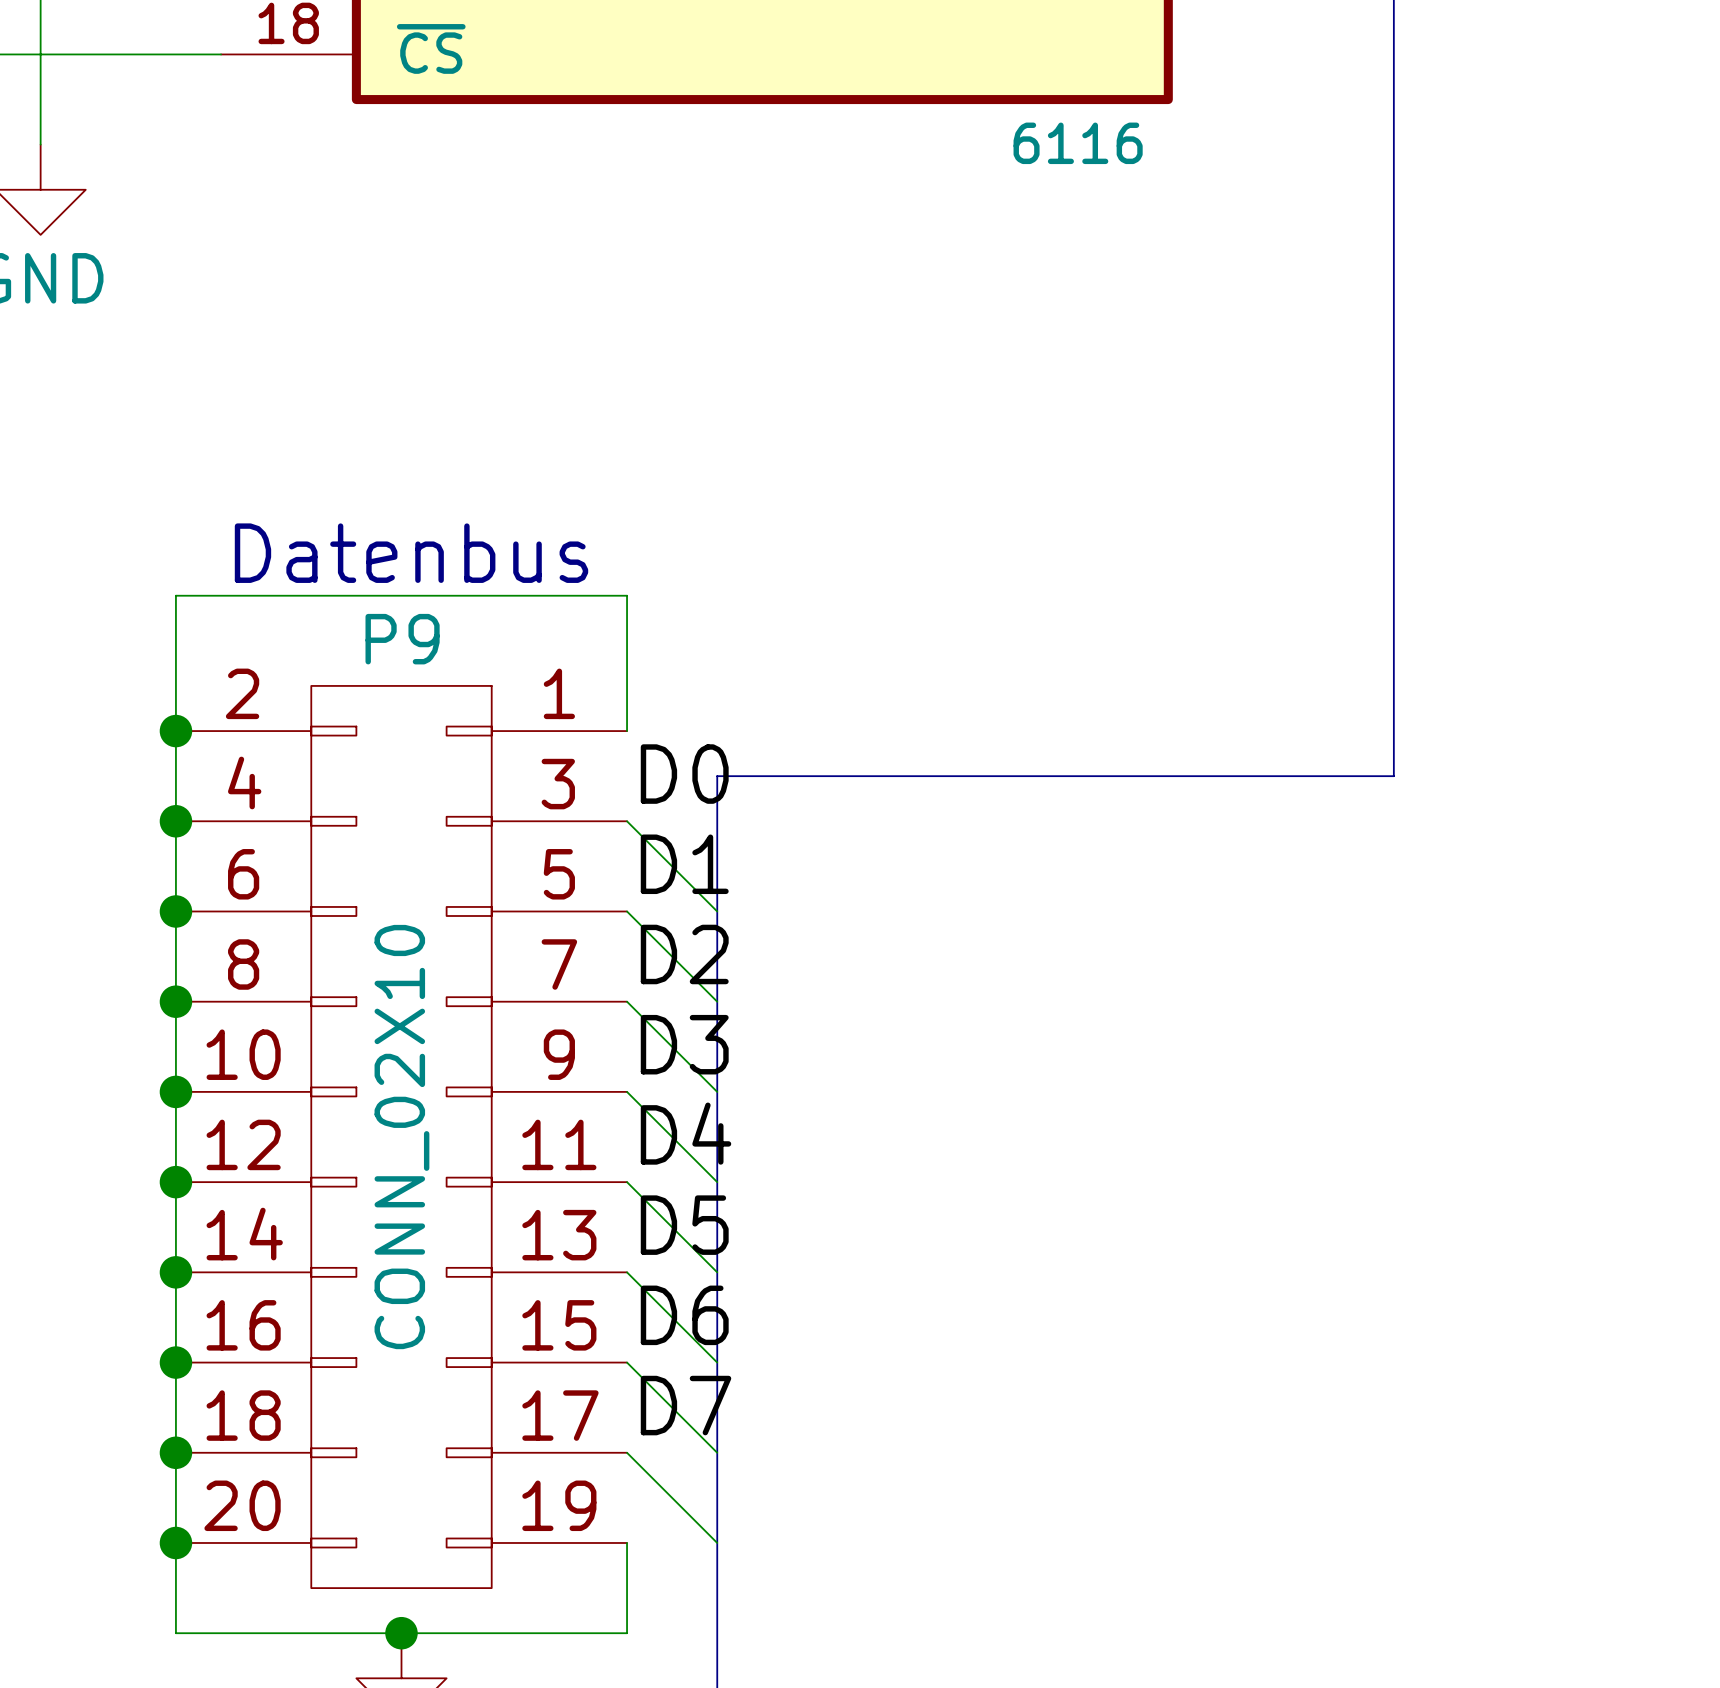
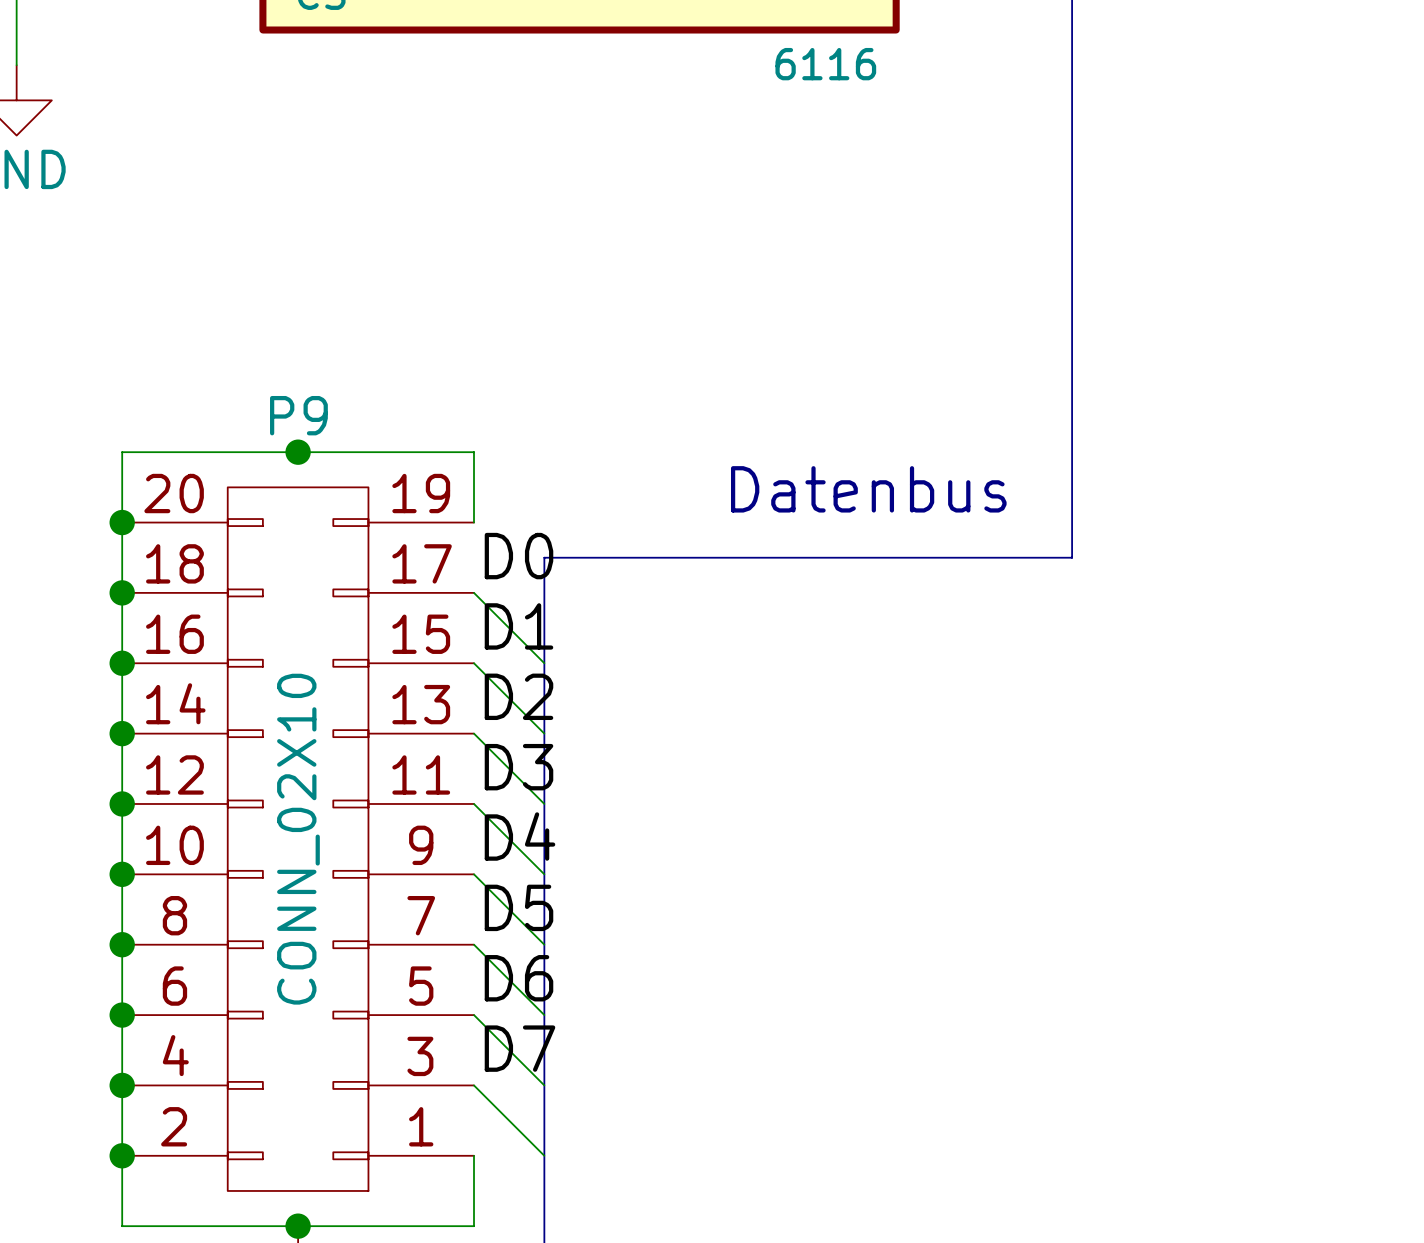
text position: Datenbus (411, 553) -> Datenbus (868, 489)
wire: (175, 640) (175, 595) (627, 595) (627, 640) -> (122, 452) (474, 452)
junction: none -> (298, 452)
P9 flip: as is (401, 1137) -> up-down (298, 839)

